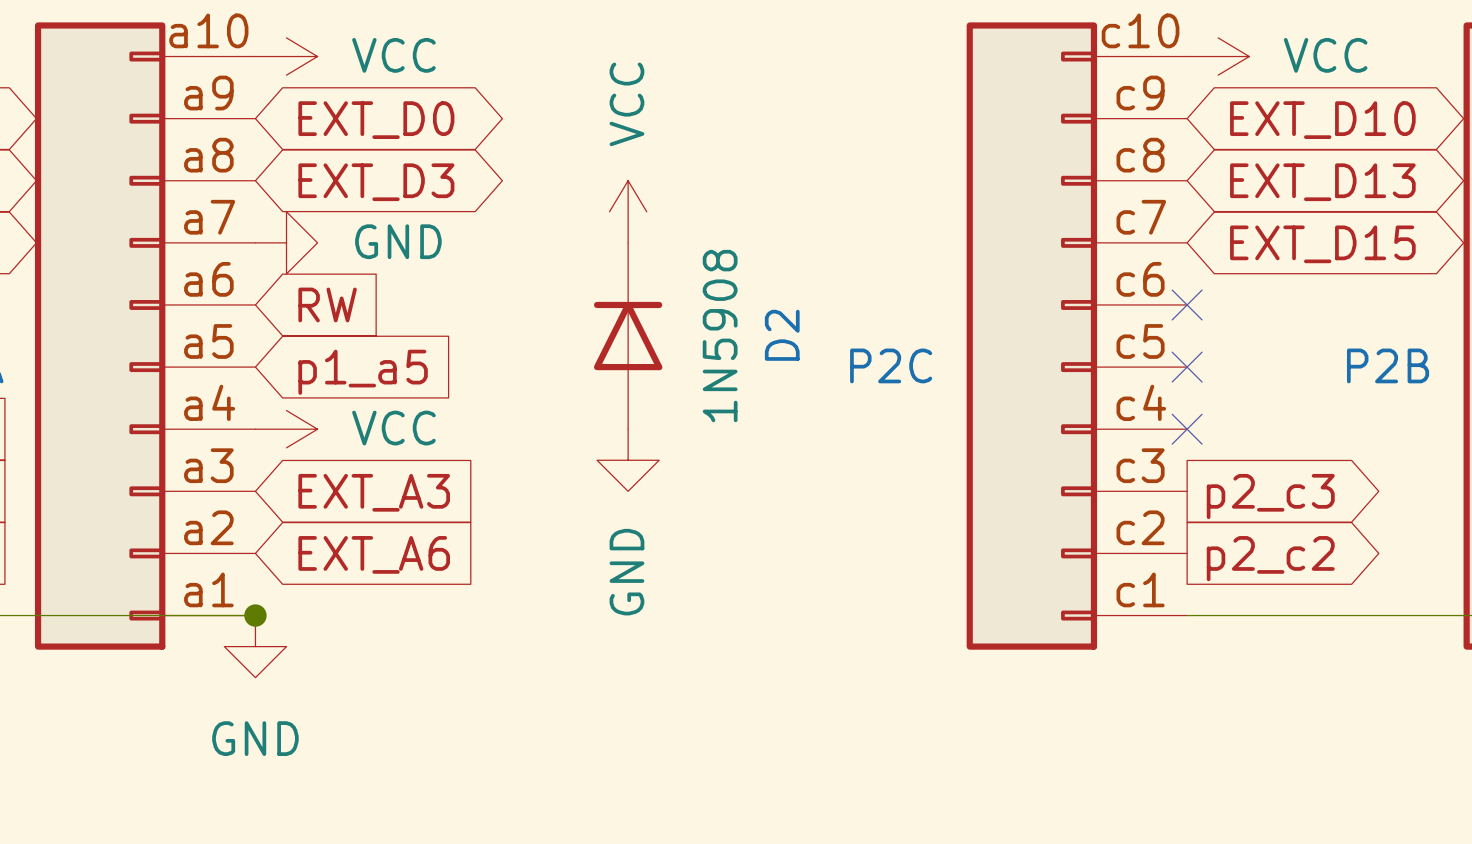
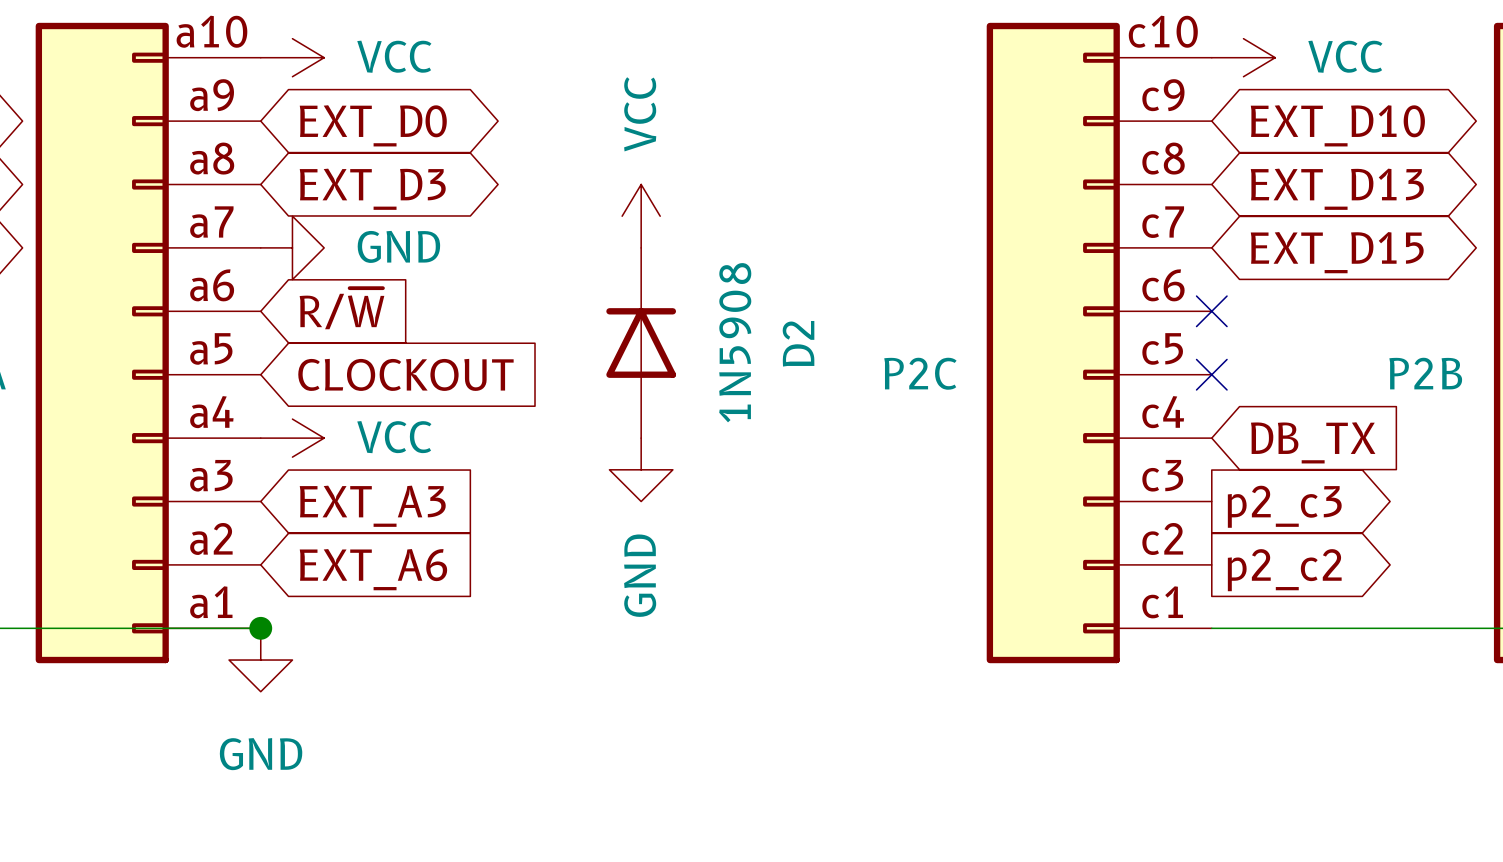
global label: RW (327, 304) -> R/~{W} (341, 308)
global label: p1_a5 (363, 372) -> CLOCKOUT (405, 374)
no-connect mark: (1187, 429) -> none
global label: none -> DB_TX (1313, 442)

